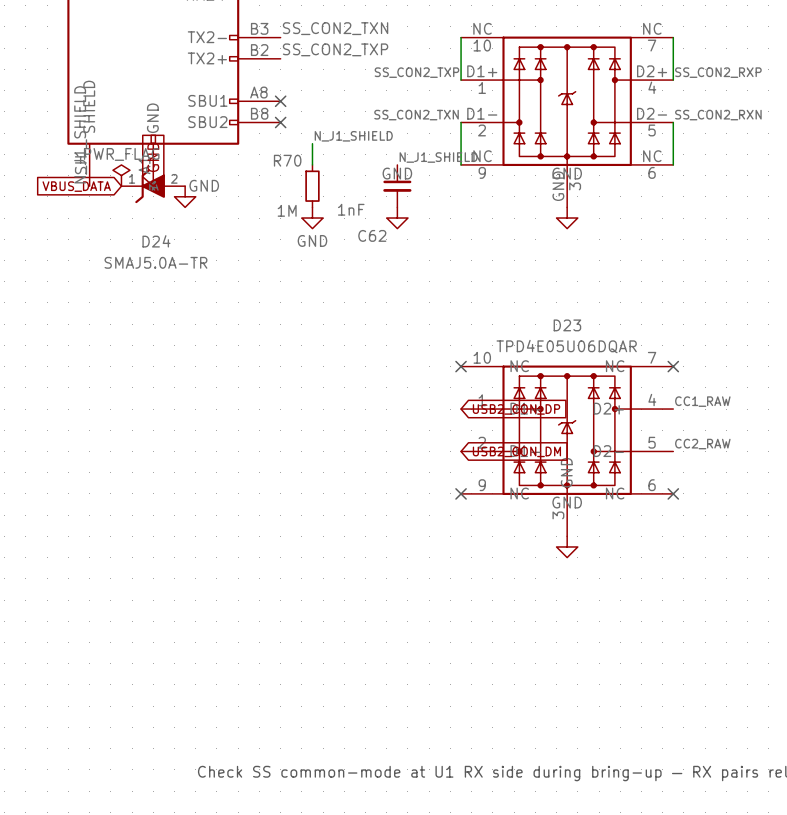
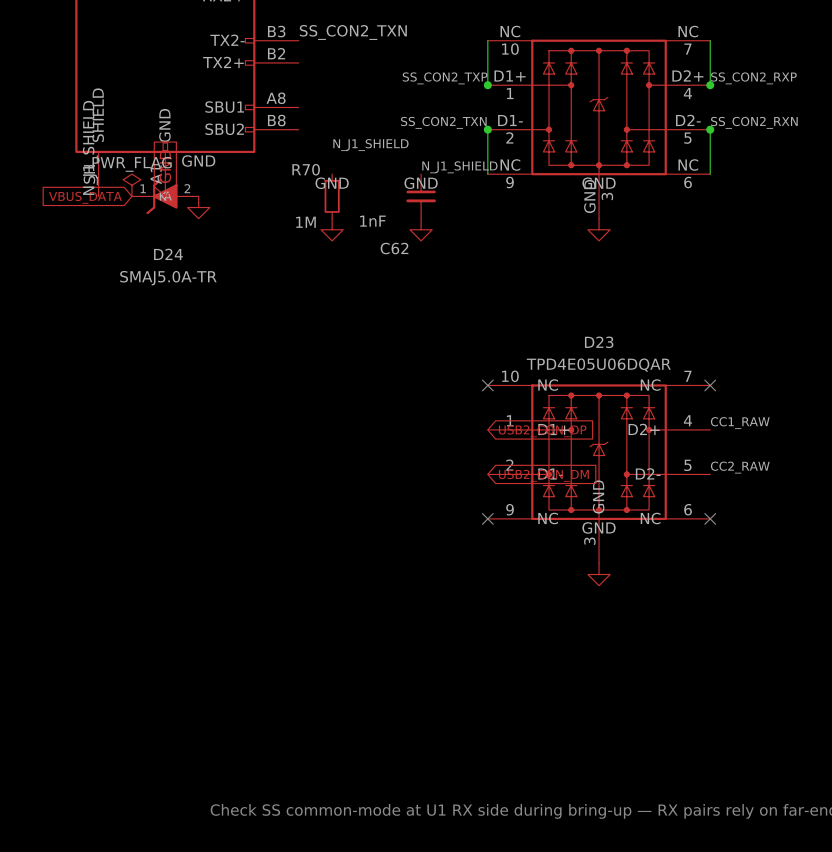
label: SS_CON2_TXP (335, 49) -> none
junction: none -> (487, 85)
junction: none -> (710, 85)
no-connect mark: (280, 101) -> none
no-connect mark: (280, 122) -> none
junction: none -> (487, 129)
junction: none -> (710, 129)
wire: (312, 143) (312, 164) -> none
power symbol text position: GND (204, 185) -> GND (198, 160)
power symbol text position: GND (312, 240) -> GND (332, 183)

